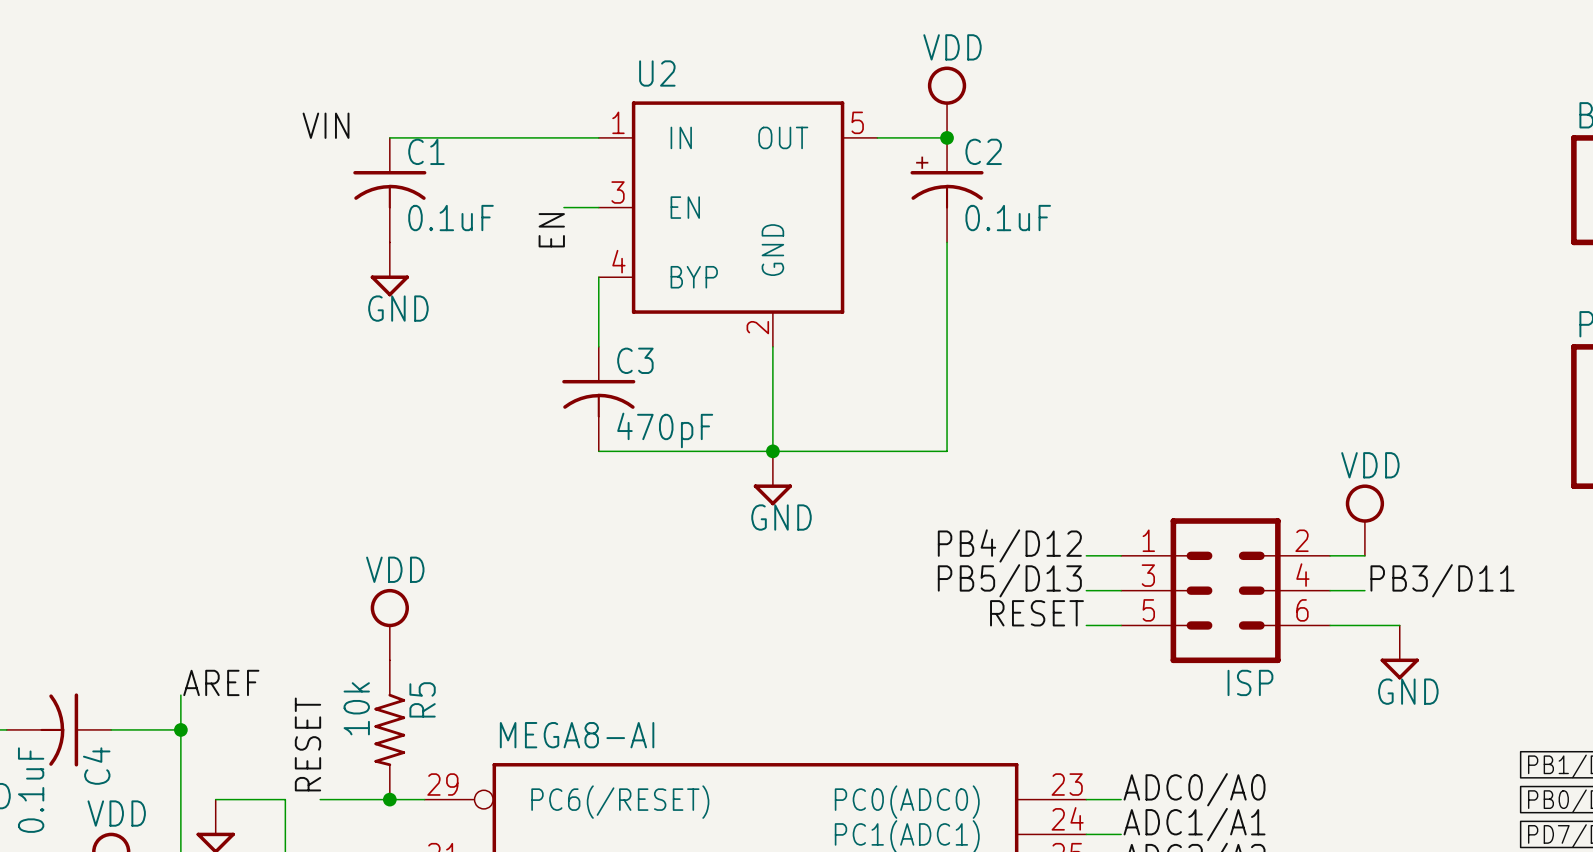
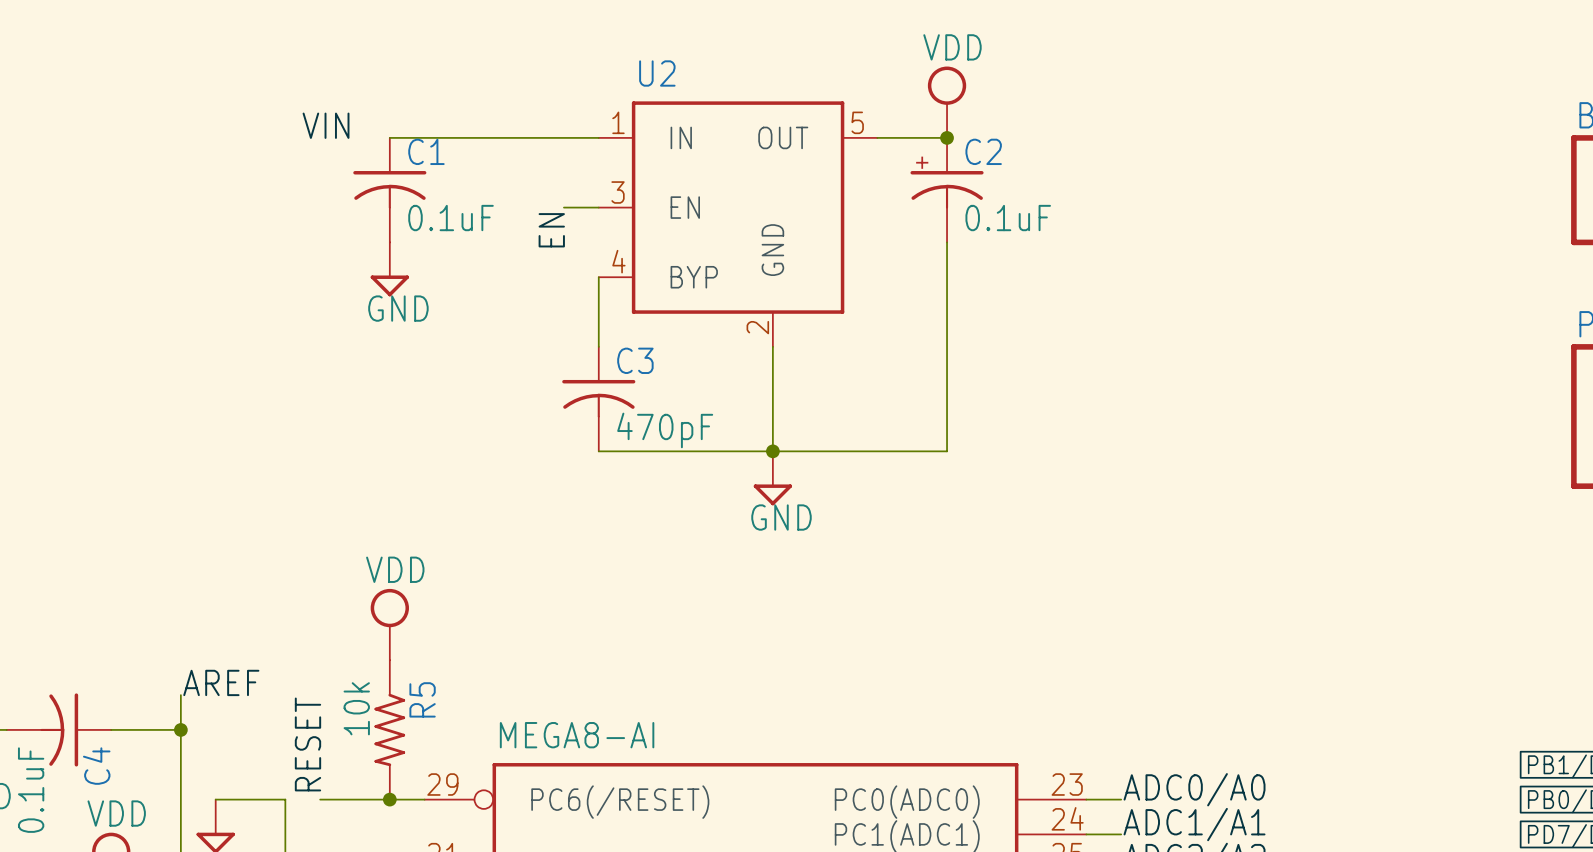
power symbol: VDD (1364, 520) -> none
label: PB4/D12 (1009, 545) -> none
wire: (1086, 555) (1121, 555) -> none
wire: (1330, 555) (1364, 555) -> none
label: PB5/D13 (1009, 580) -> none
label: PB3/D11 (1442, 580) -> none
wire: (1086, 590) (1121, 590) -> none
ISP: (1225, 590) -> none
wire: (1330, 590) (1364, 590) -> none
label: RESET (1036, 613) -> none
wire: (1086, 625) (1121, 625) -> none
wire: (1330, 625) (1399, 625) -> none
power symbol: GND (1399, 652) -> none

